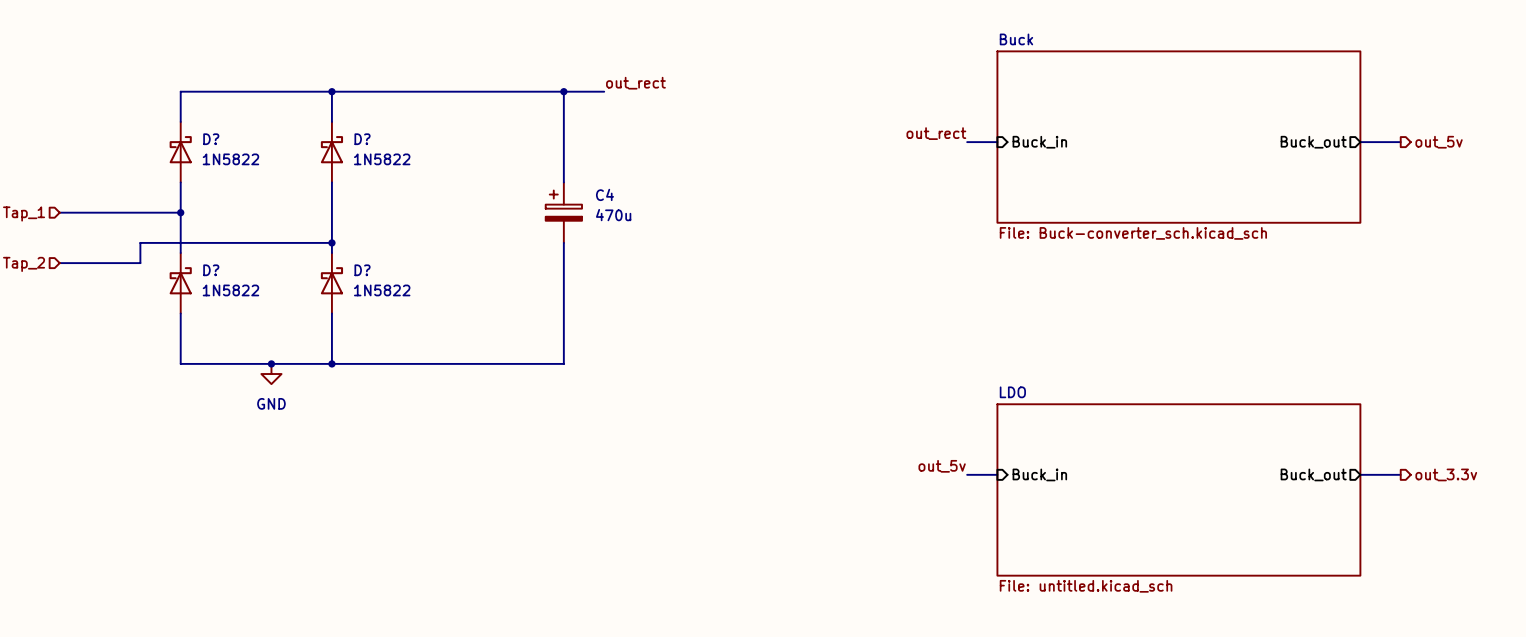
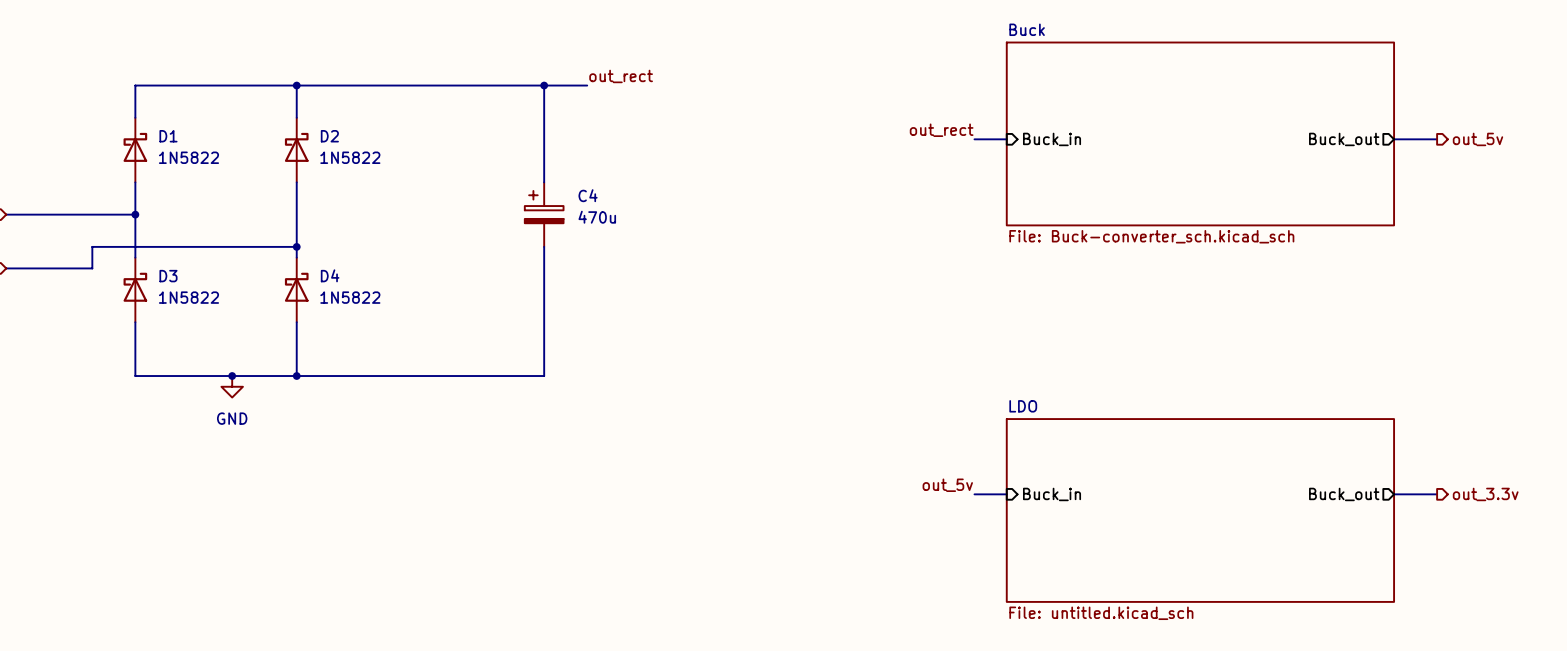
D? name: D? (211, 139) -> D1 (168, 136)
D? name: D? (362, 139) -> D2 (329, 136)
D? name: D? (211, 270) -> D3 (168, 276)
D? name: D? (362, 270) -> D4 (330, 275)

